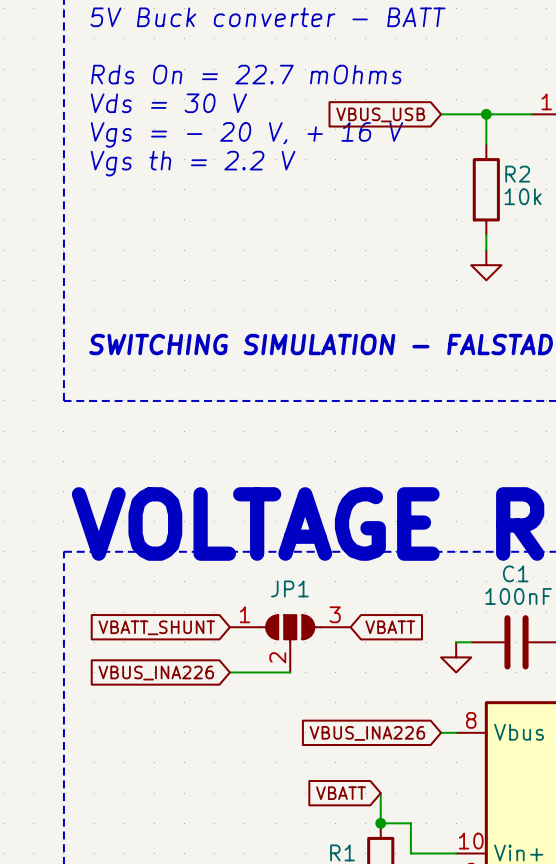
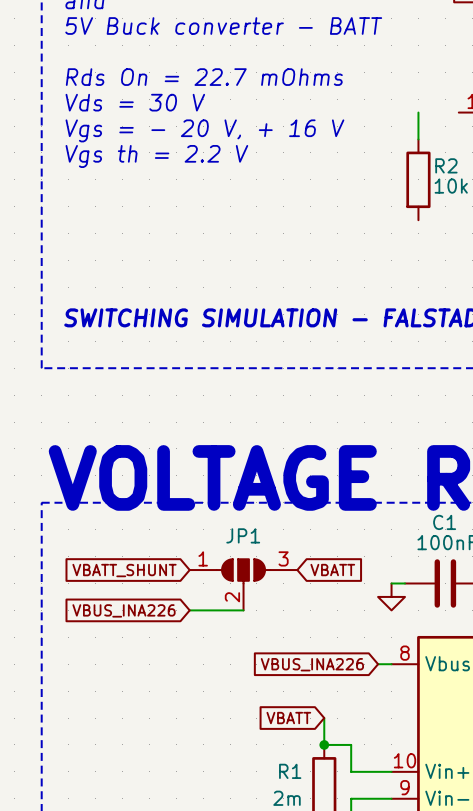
global label: VBUS_USB (380, 114) -> none
wire: (441, 114) (531, 114) -> none
junction: (486, 114) -> none
wire: (486, 235) (486, 250) -> none
power symbol: (486, 265) -> none

